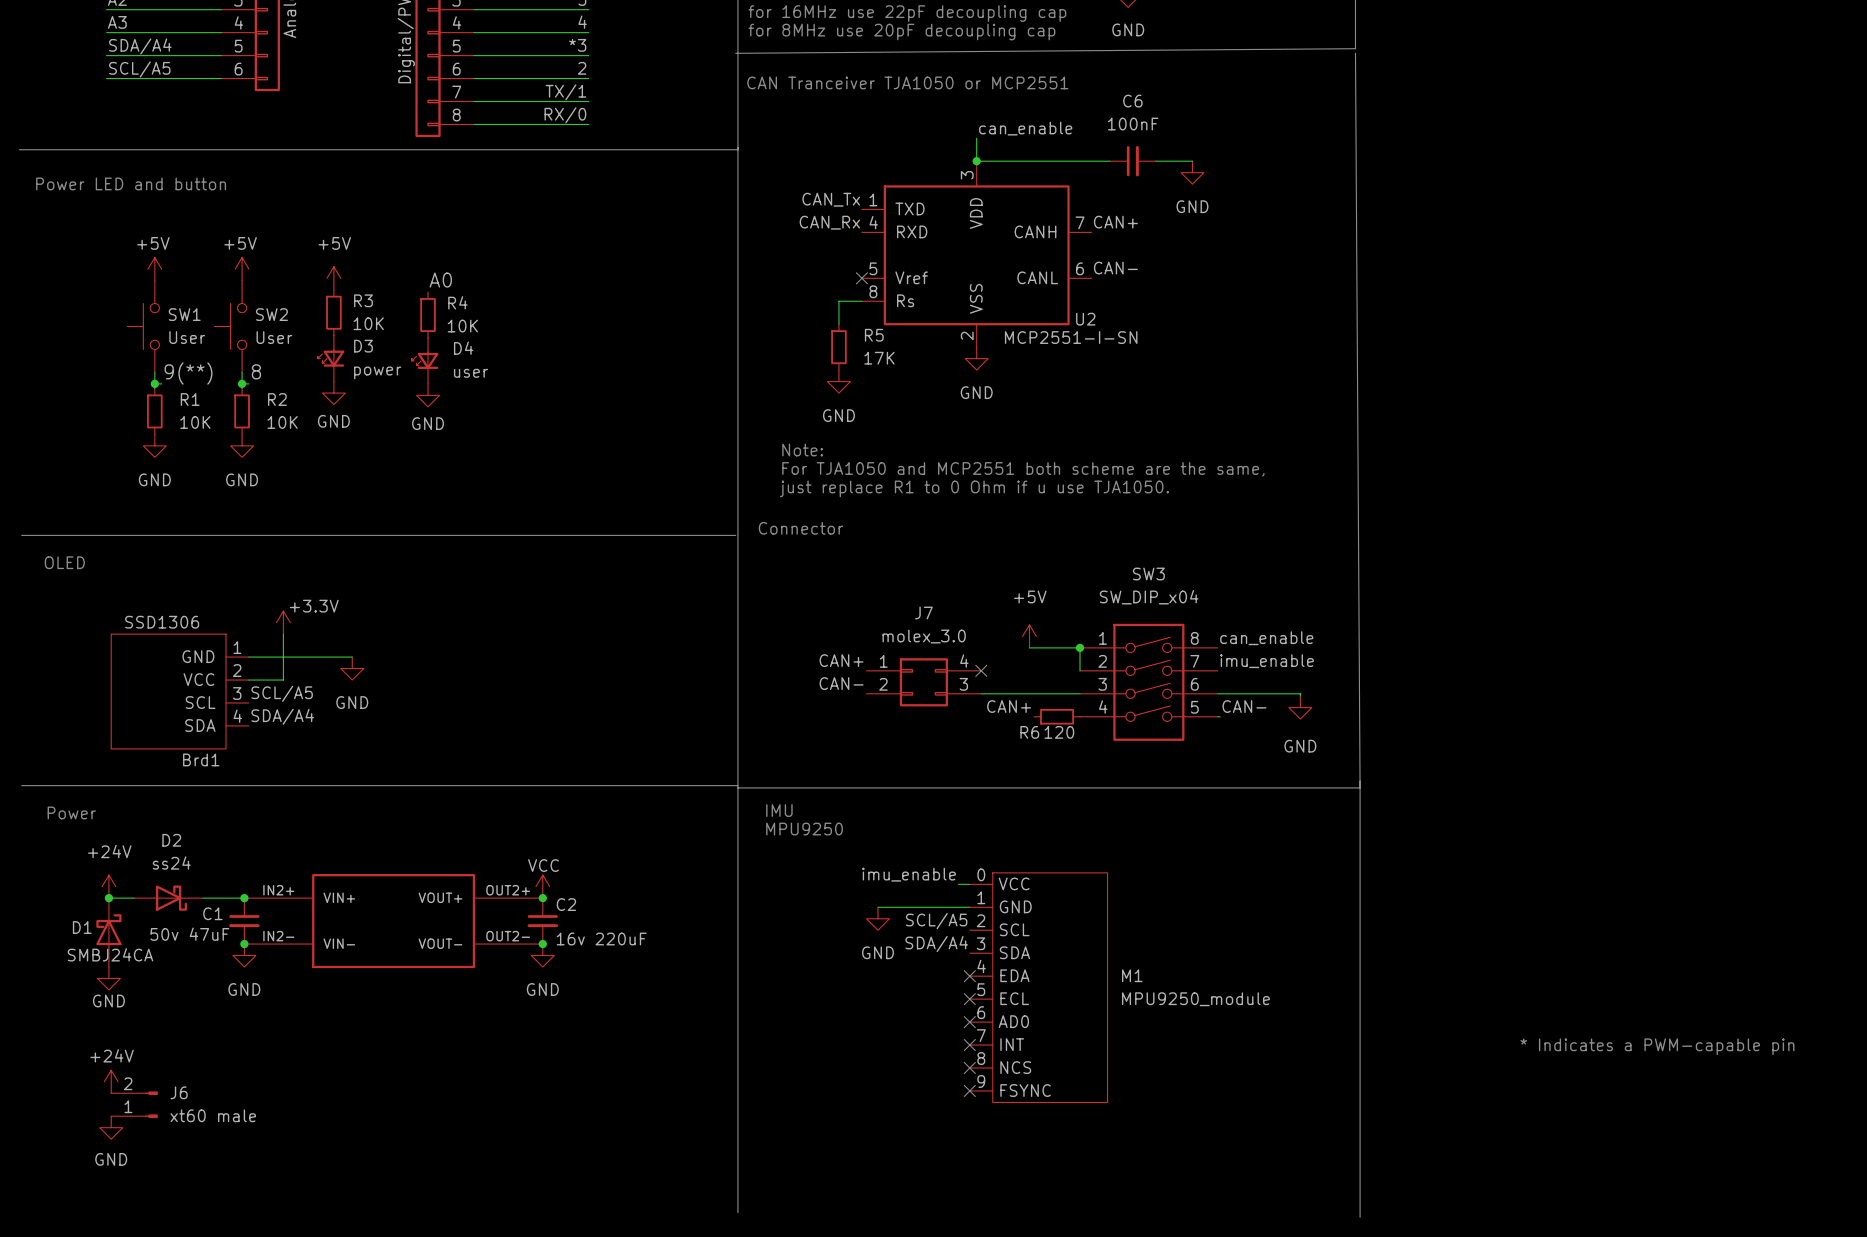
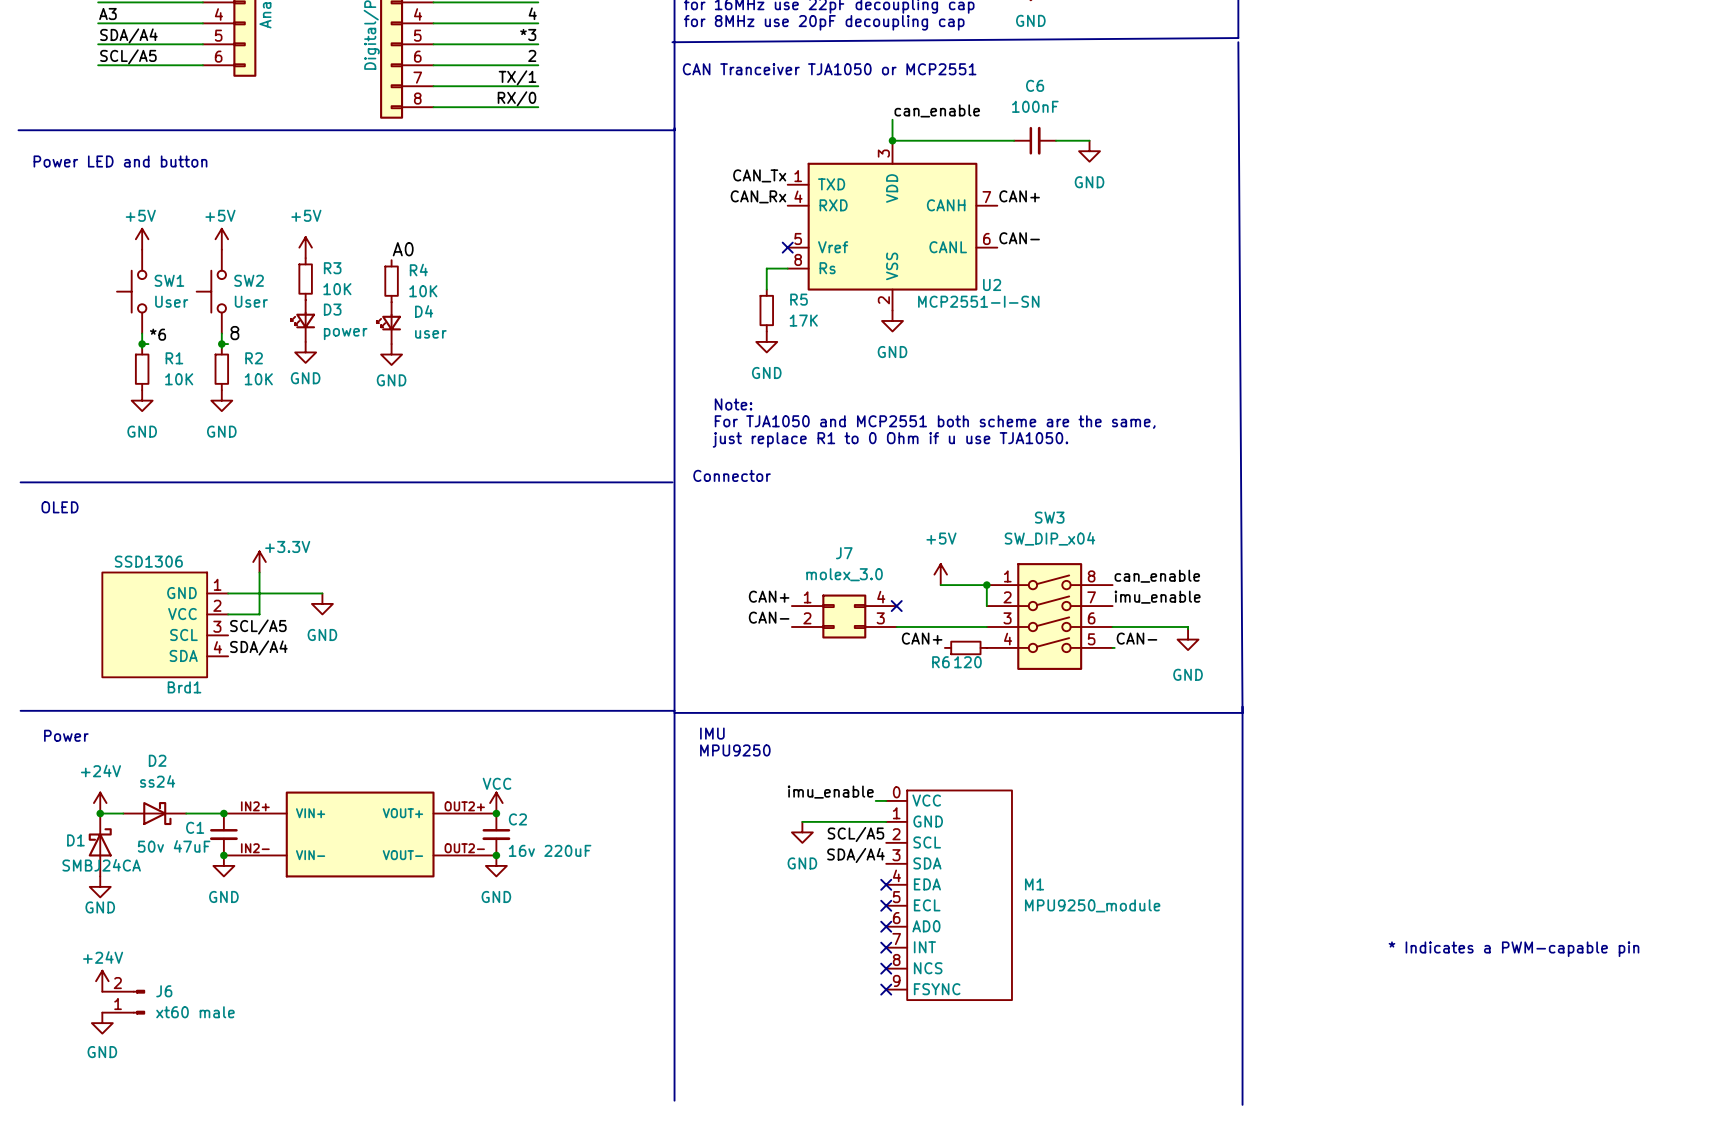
label: 9(**) (188, 373) -> *6 (158, 334)

